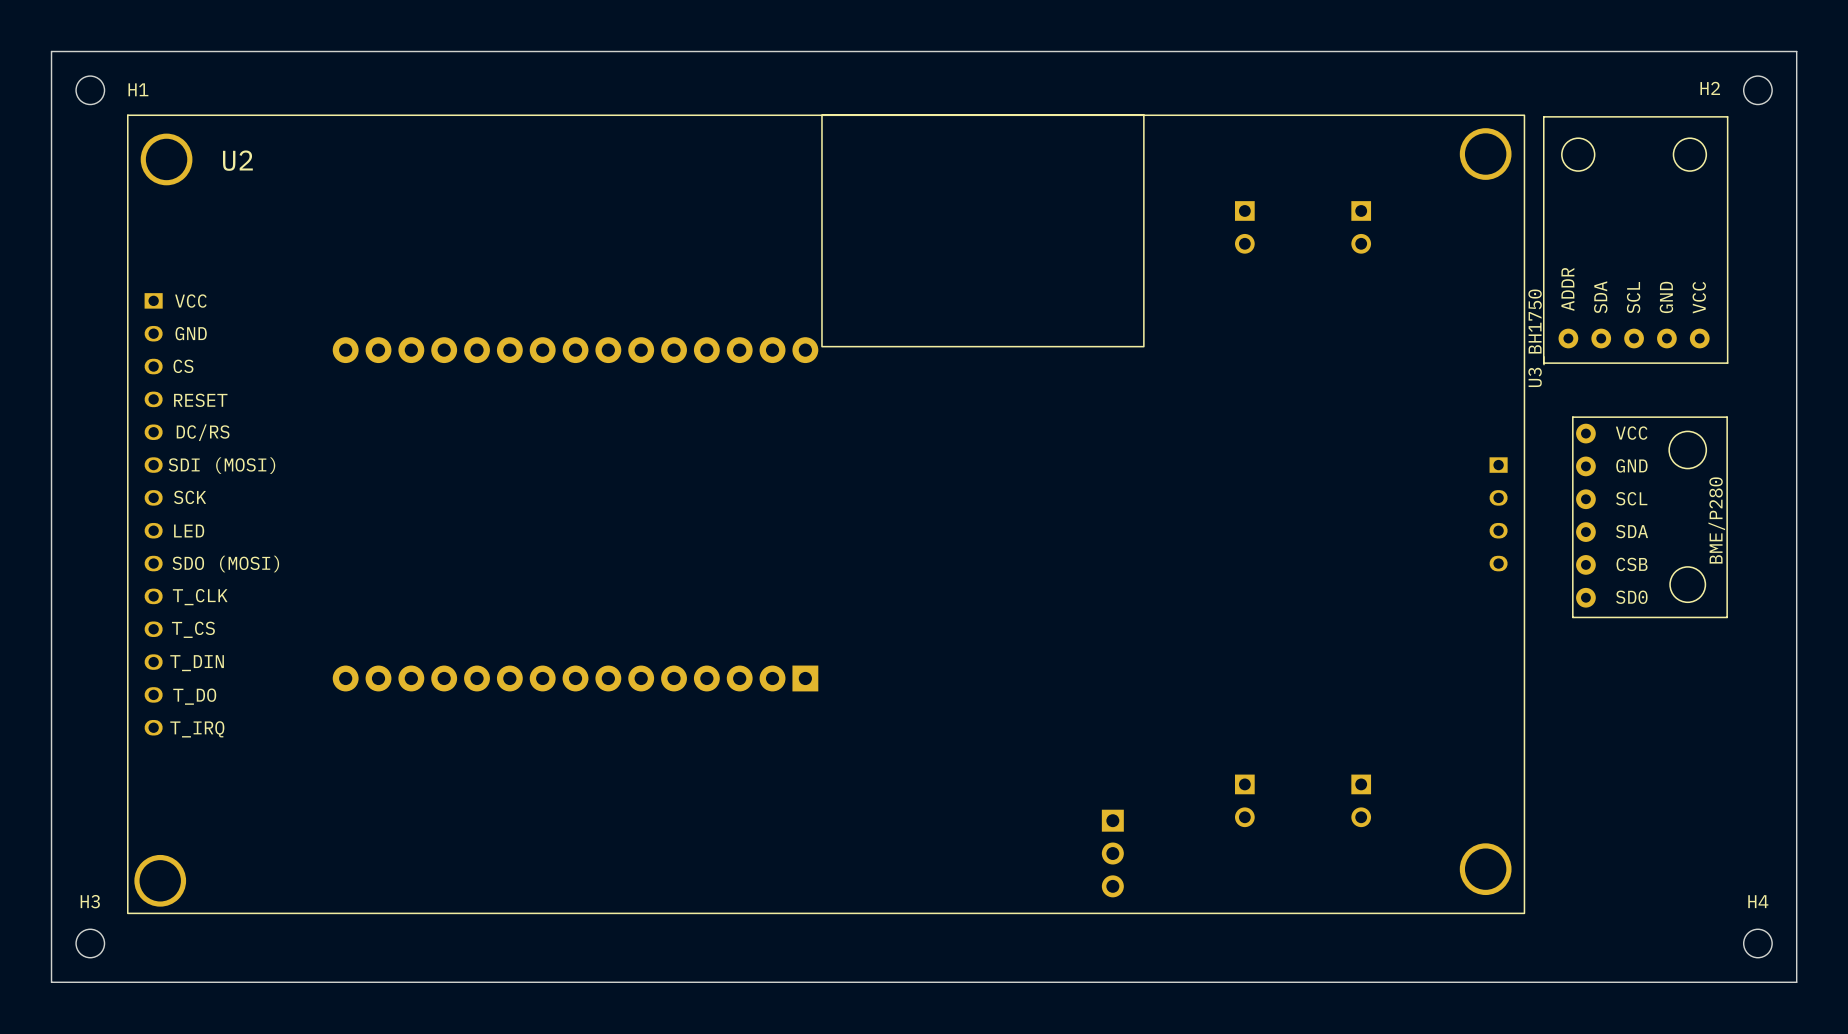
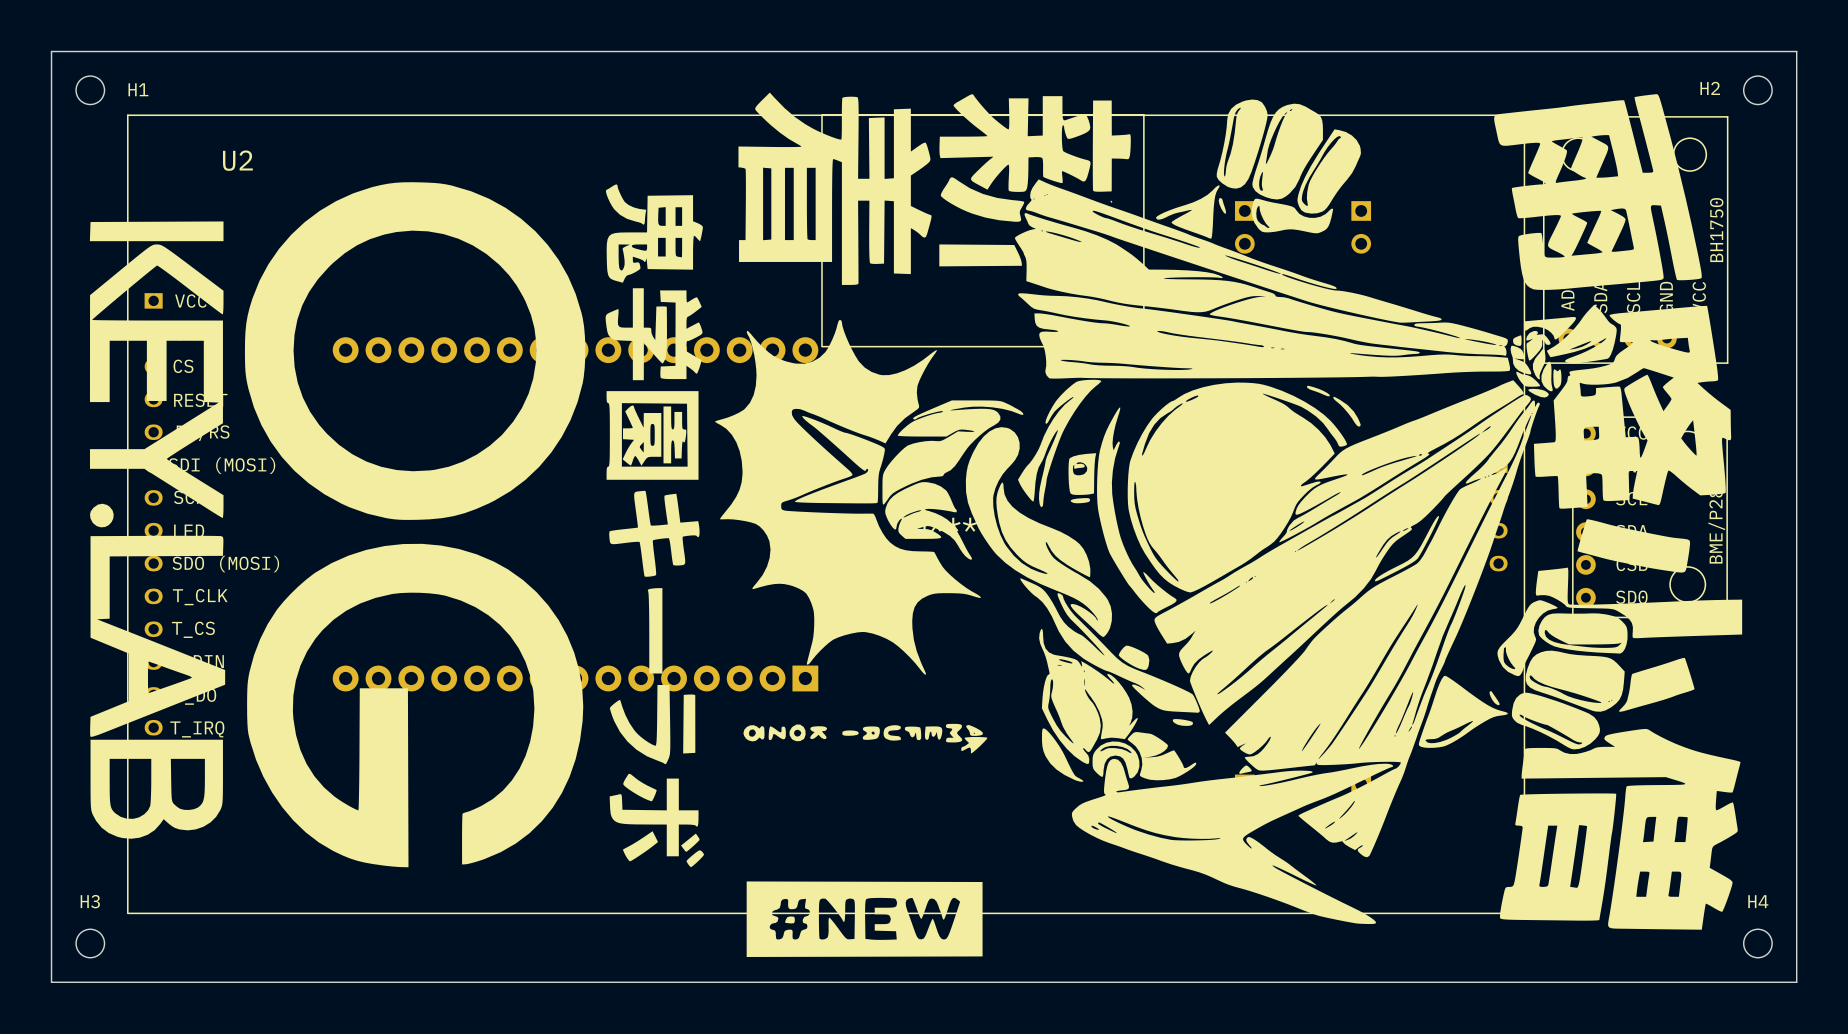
U2 footprint: [127, 114, 1526, 915] -> [127, 114, 1526, 915]
U3_BH1750 name: U3_BH1750 (1536, 338) -> BH1750 (1716, 230)
part: none -> (916, 524)
part: (1112, 853) -> none

